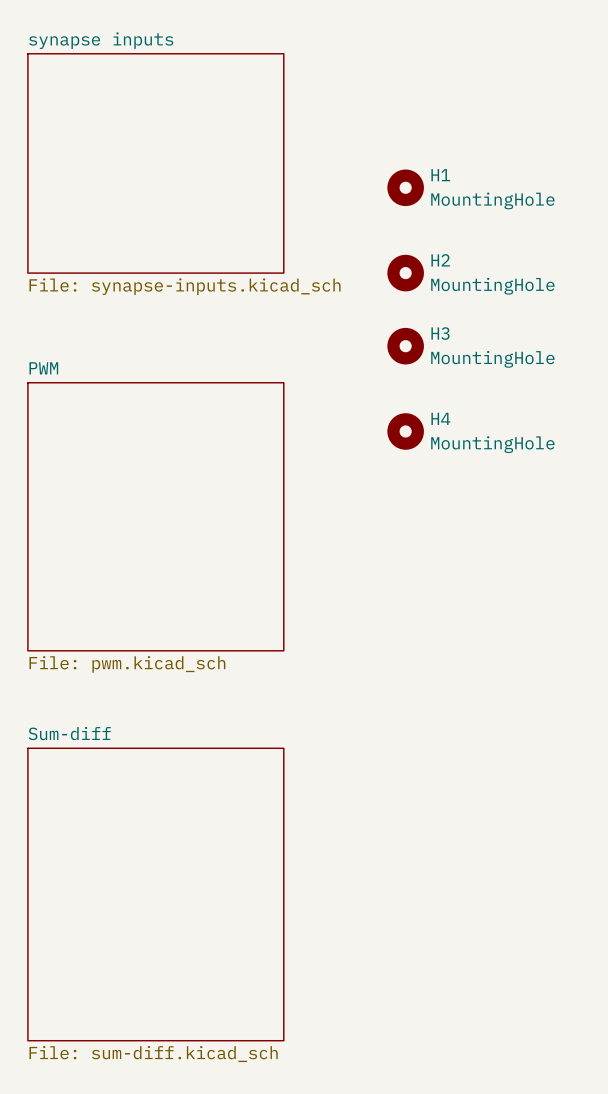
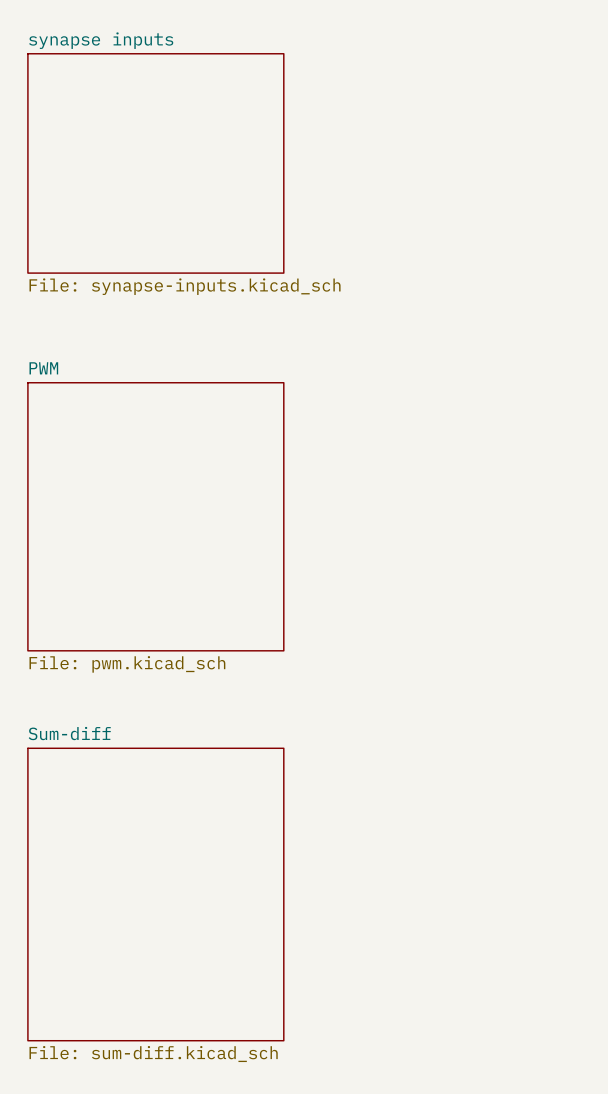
H1: MountingHole (405, 187) -> none
H2: MountingHole (405, 273) -> none
H3: MountingHole (405, 346) -> none
H4: MountingHole (405, 431) -> none

